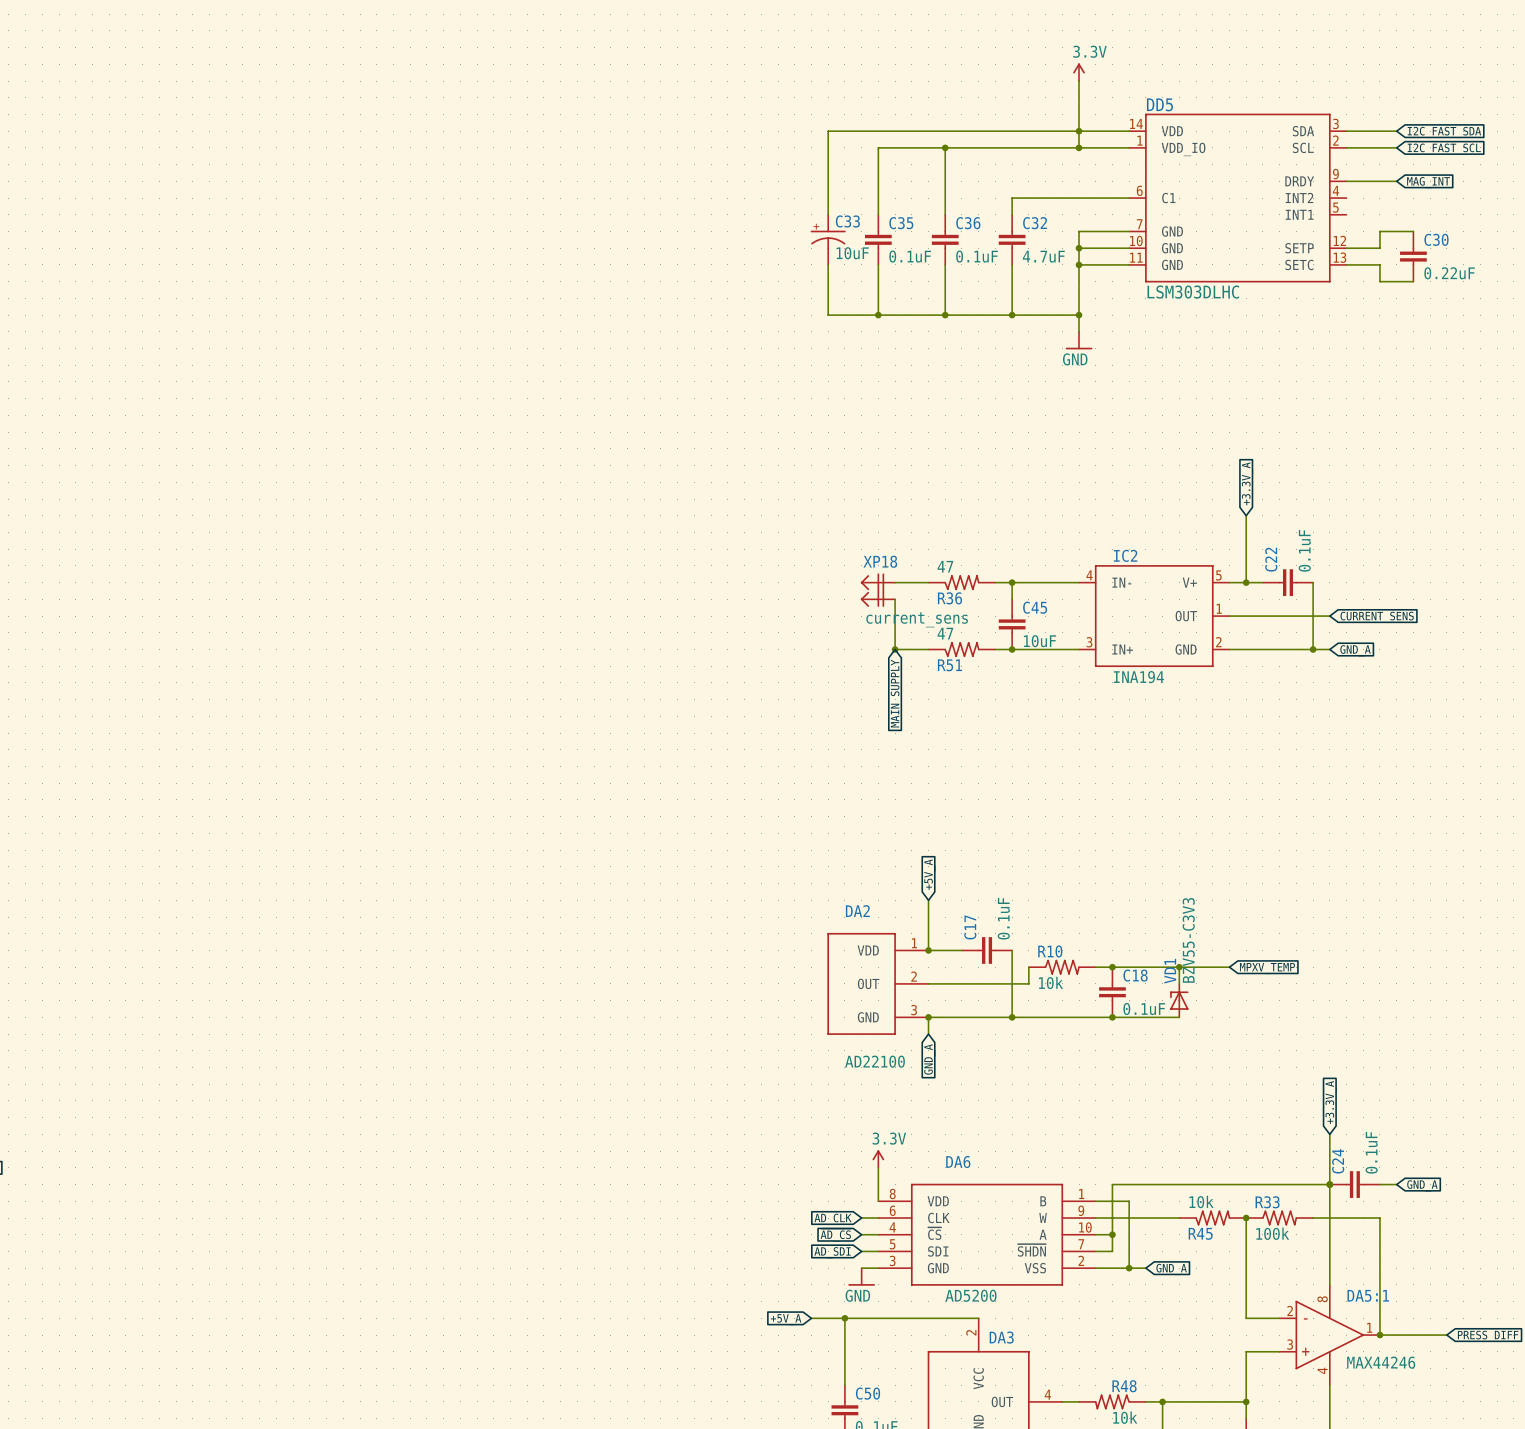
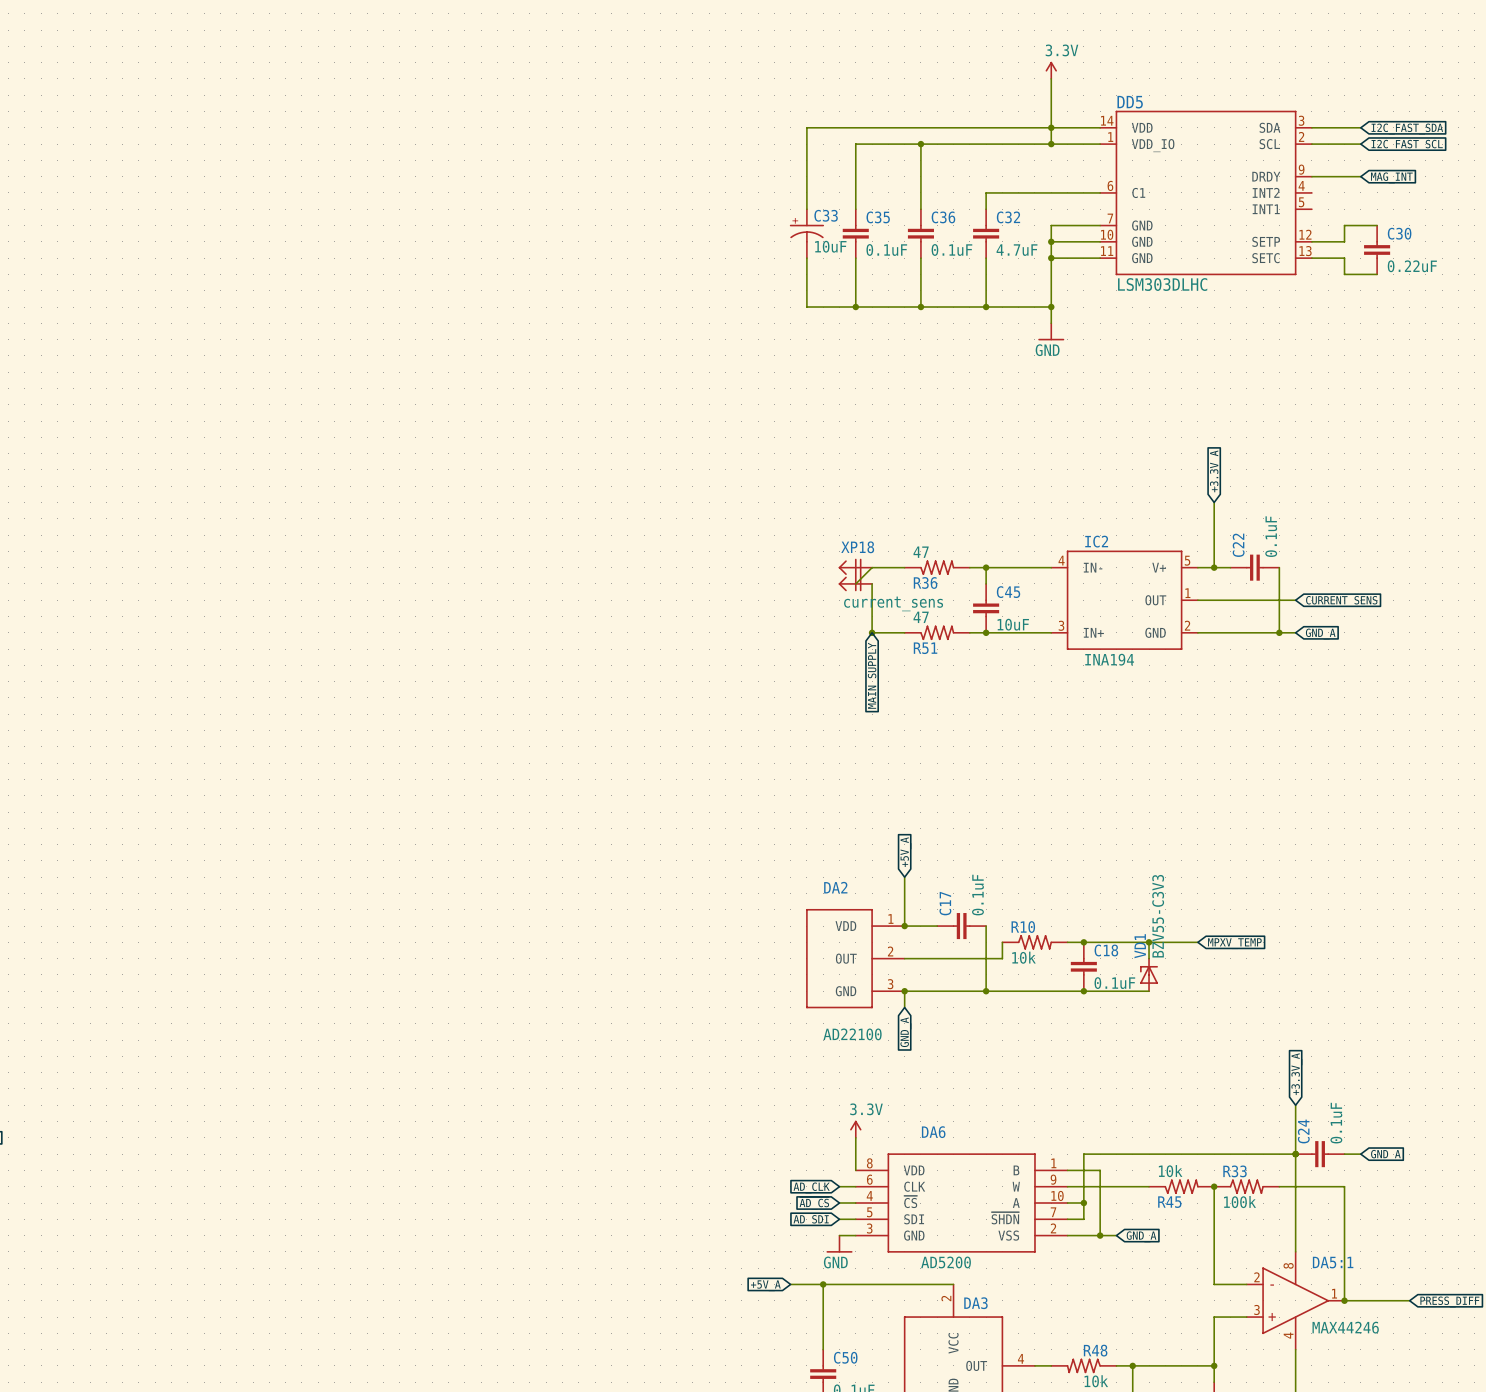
wire: none -> (872, 567) (855, 583)

